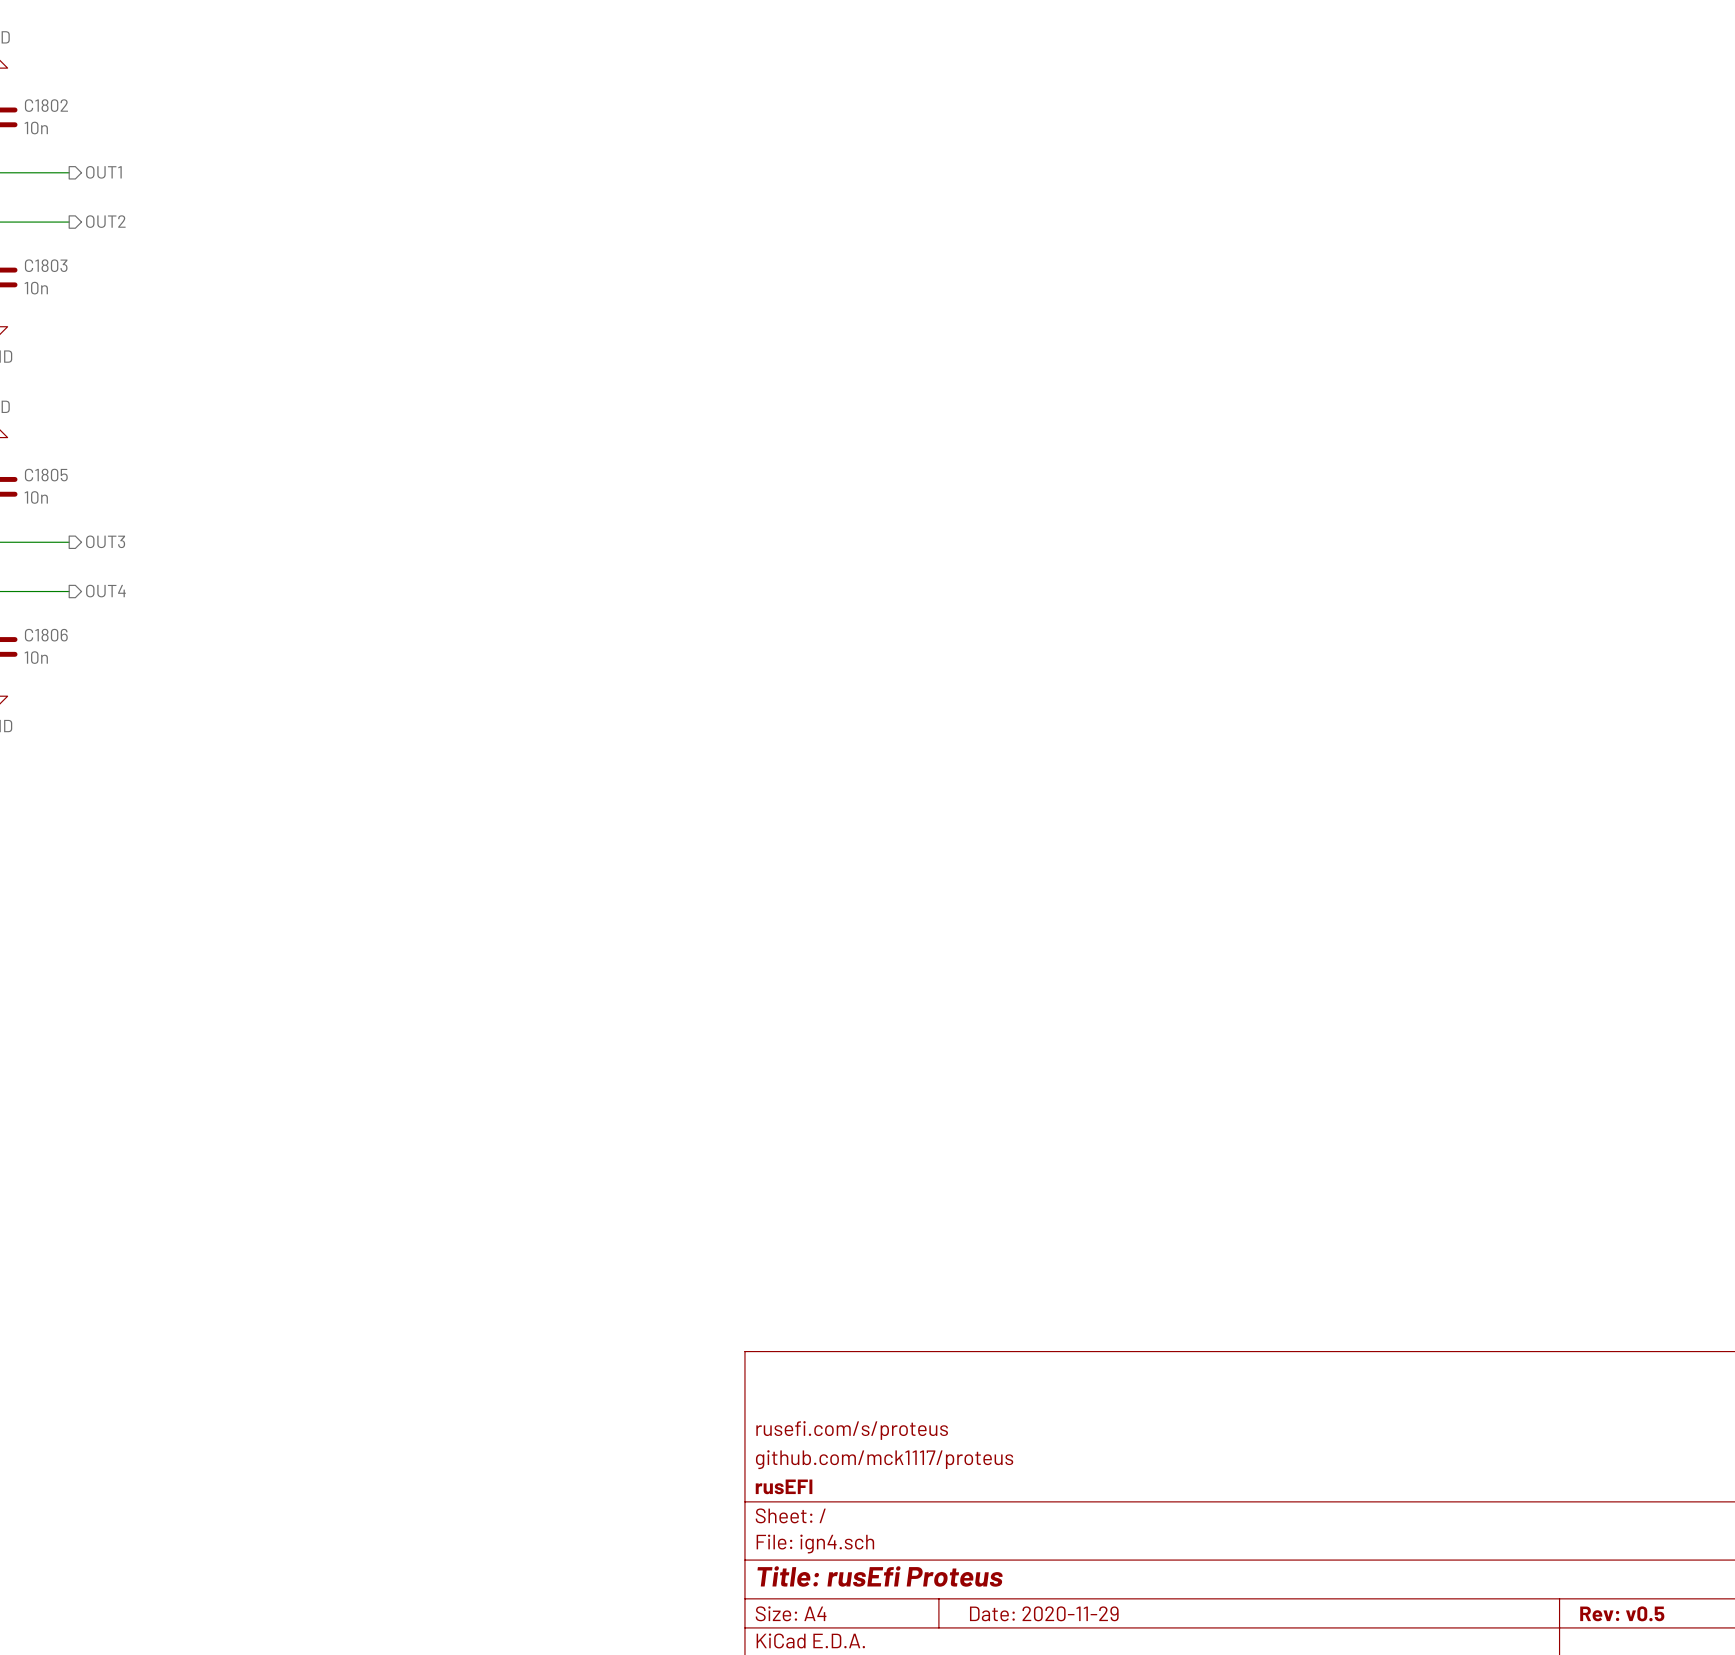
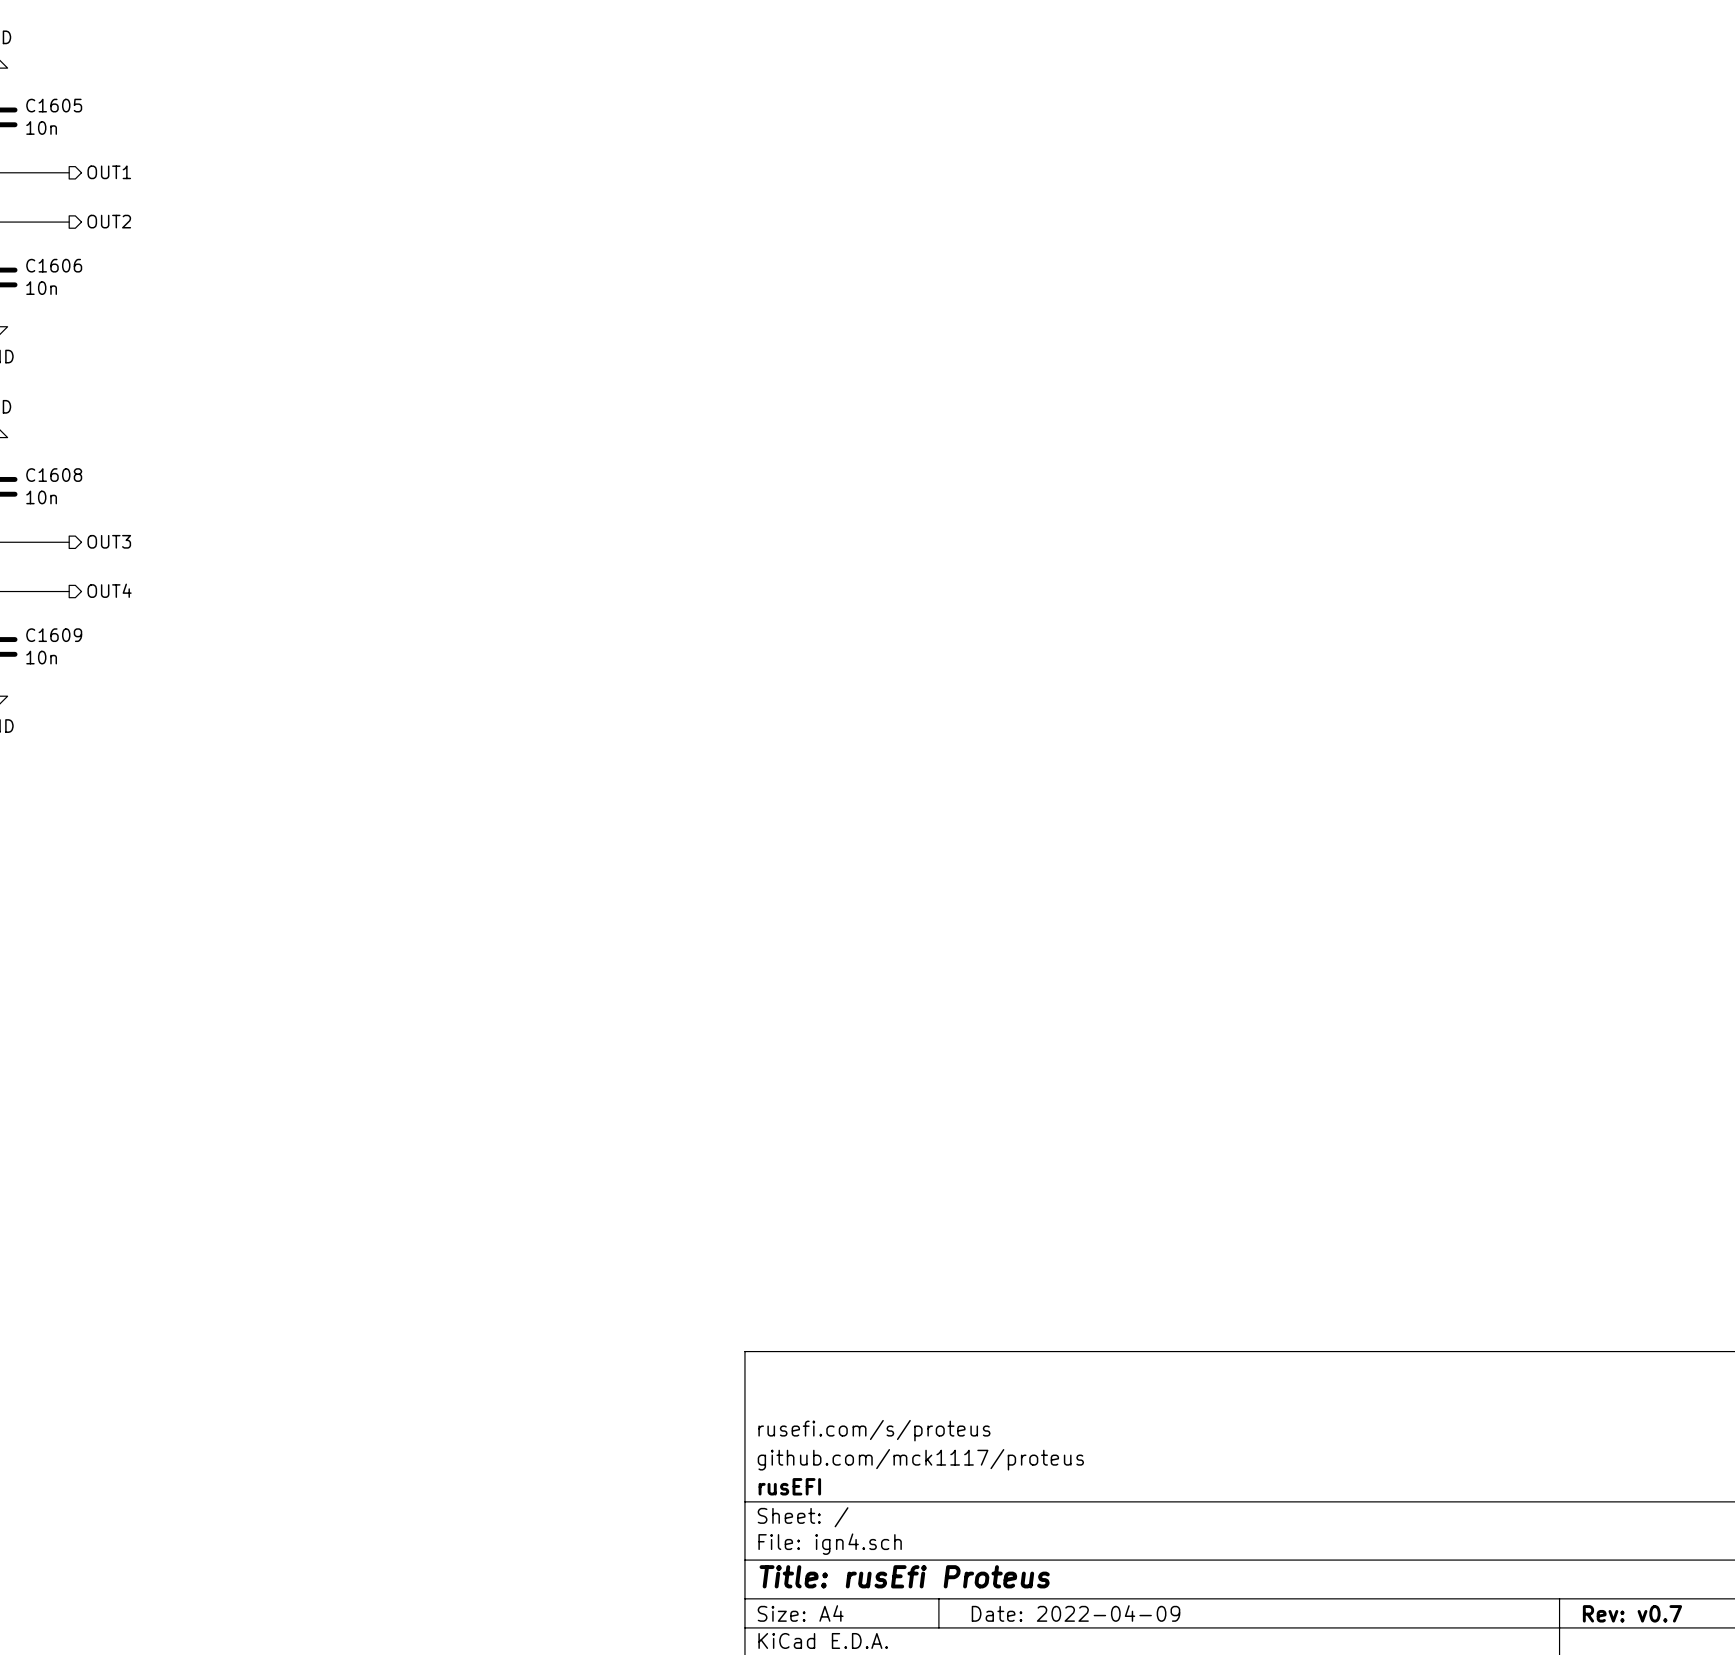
C1802 name: C1802 (46, 105) -> C1605 (54, 105)
C1803 name: C1803 (46, 265) -> C1606 (54, 265)
C1805 name: C1805 (46, 475) -> C1608 (54, 475)
C1806 name: C1806 (46, 635) -> C1609 (54, 635)
title block: Date: 2020-11-29 (1044, 1613) -> Date: 2022-04-09 (1076, 1613)
title block: Rev: v0.5 (1622, 1613) -> Rev: v0.7 (1632, 1613)

